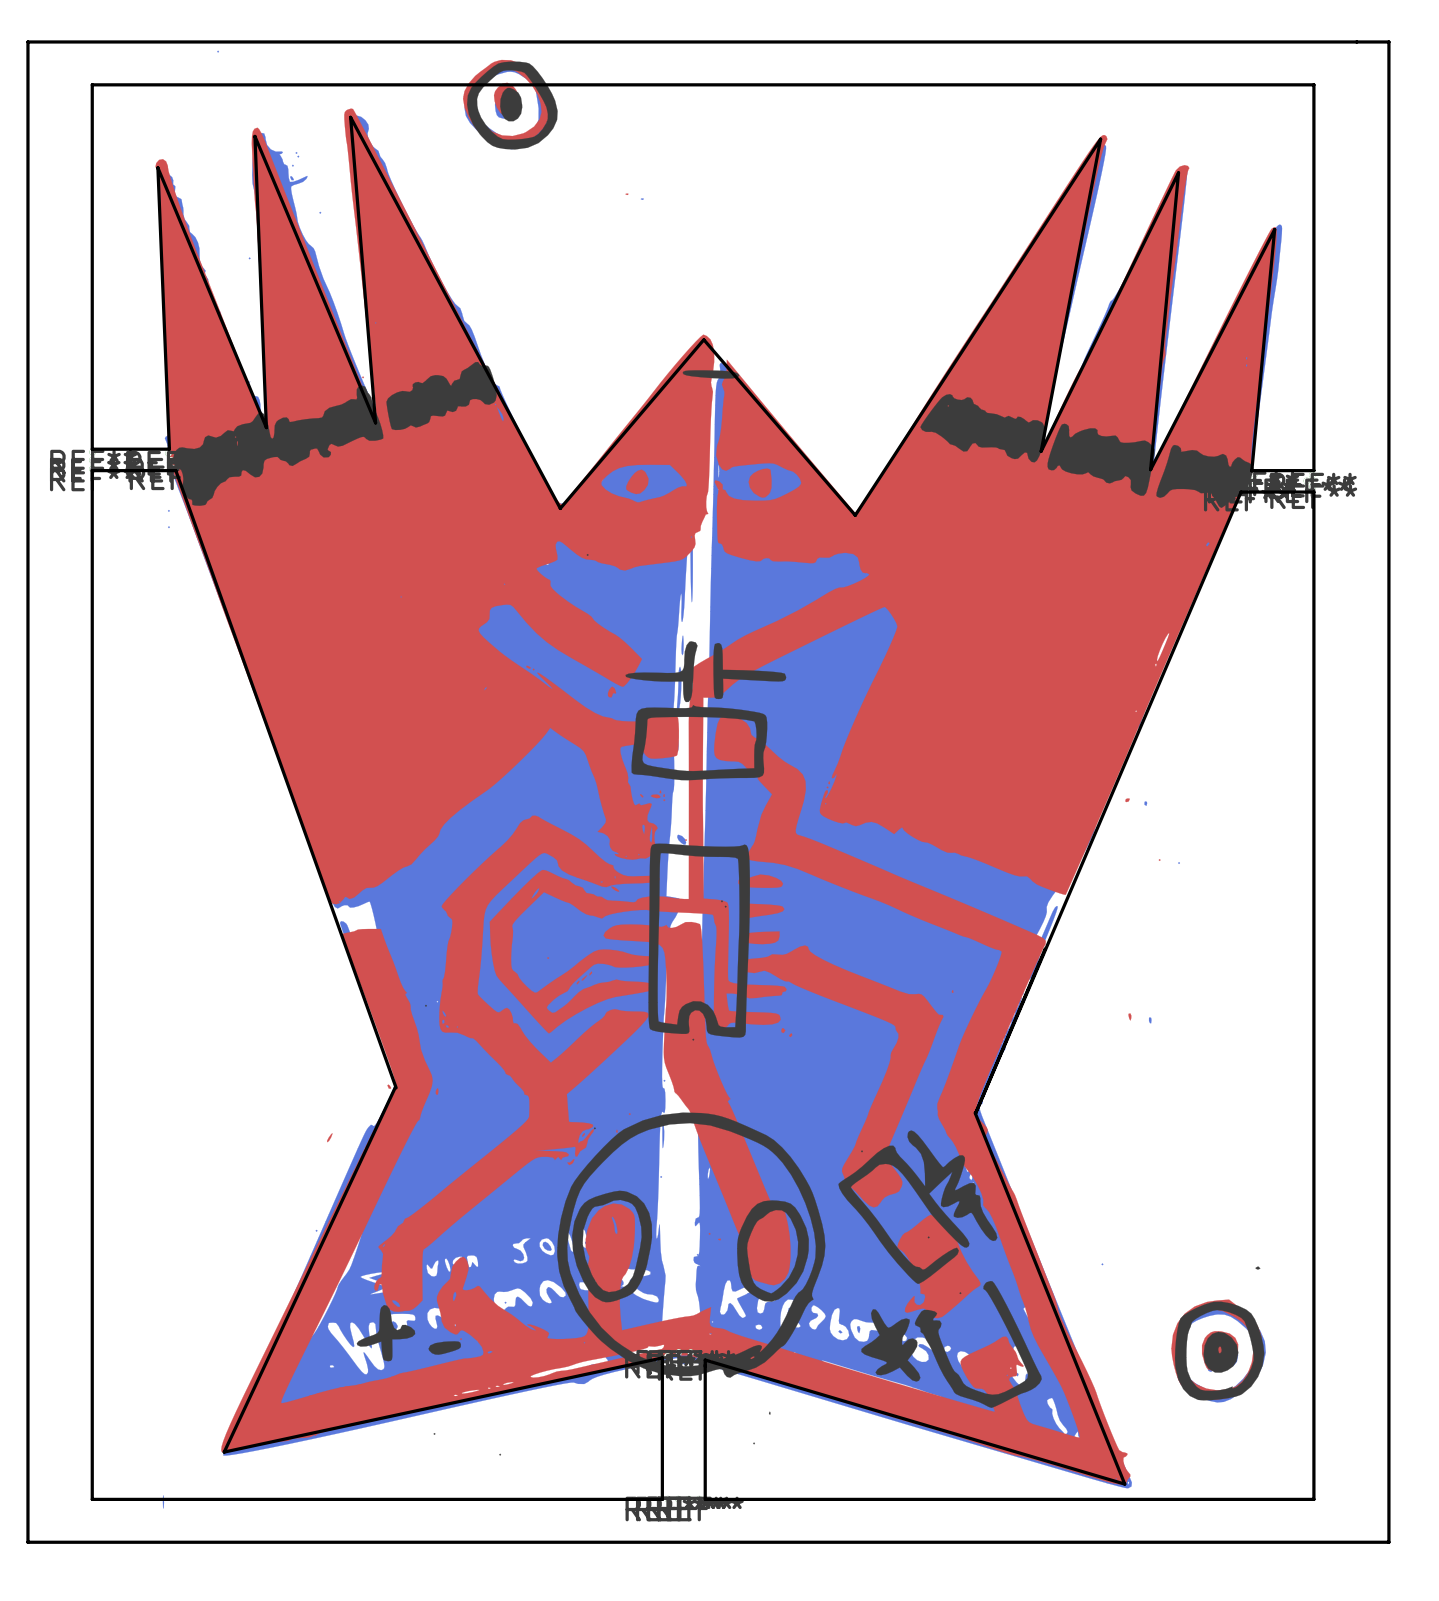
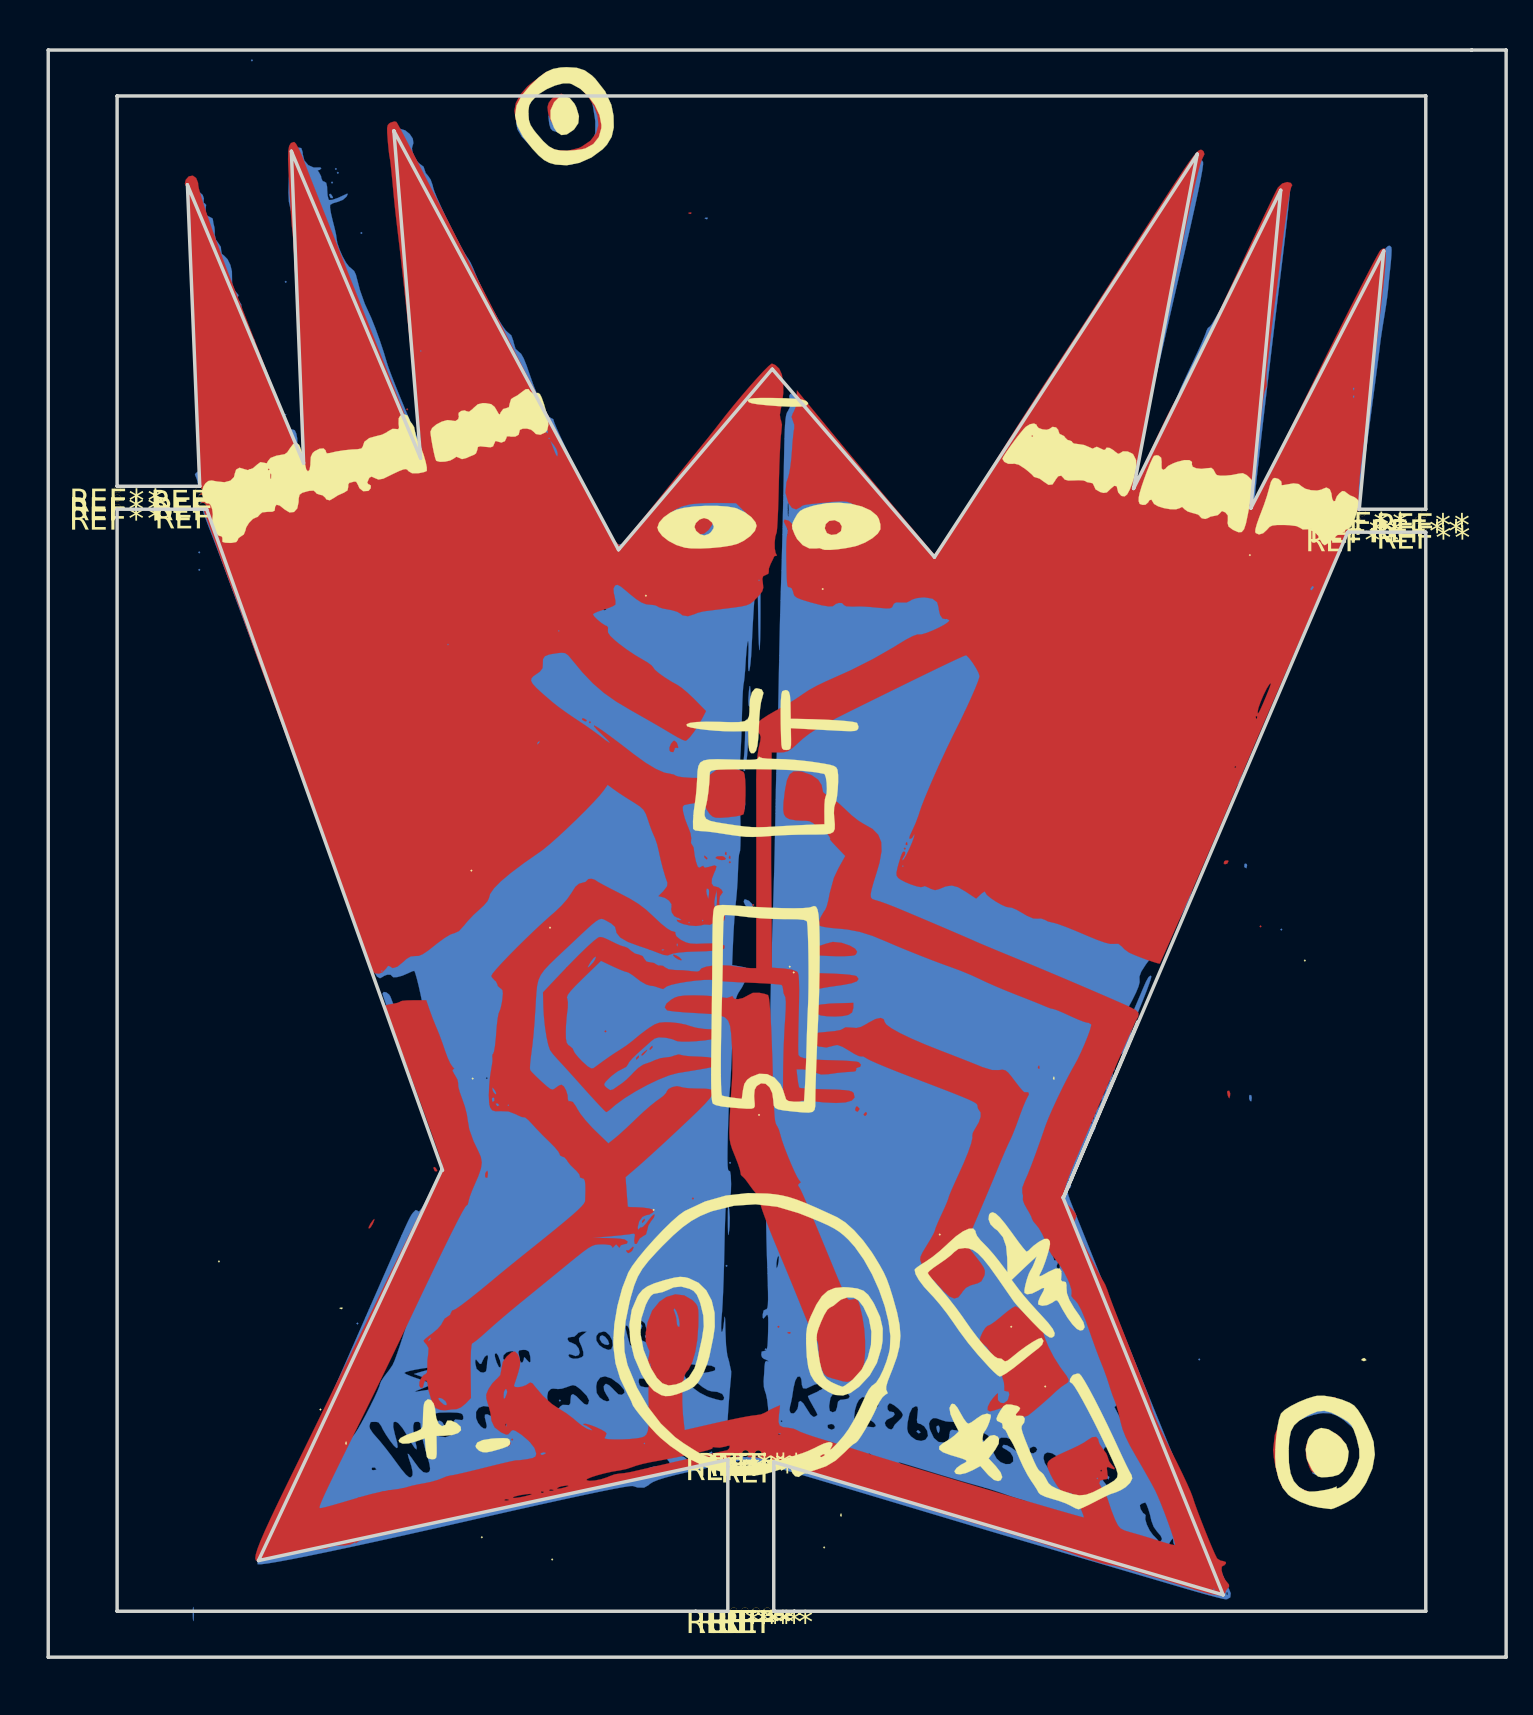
drawing shape: [173, 61, 1265, 1456] -> [201, 67, 1375, 1561]

